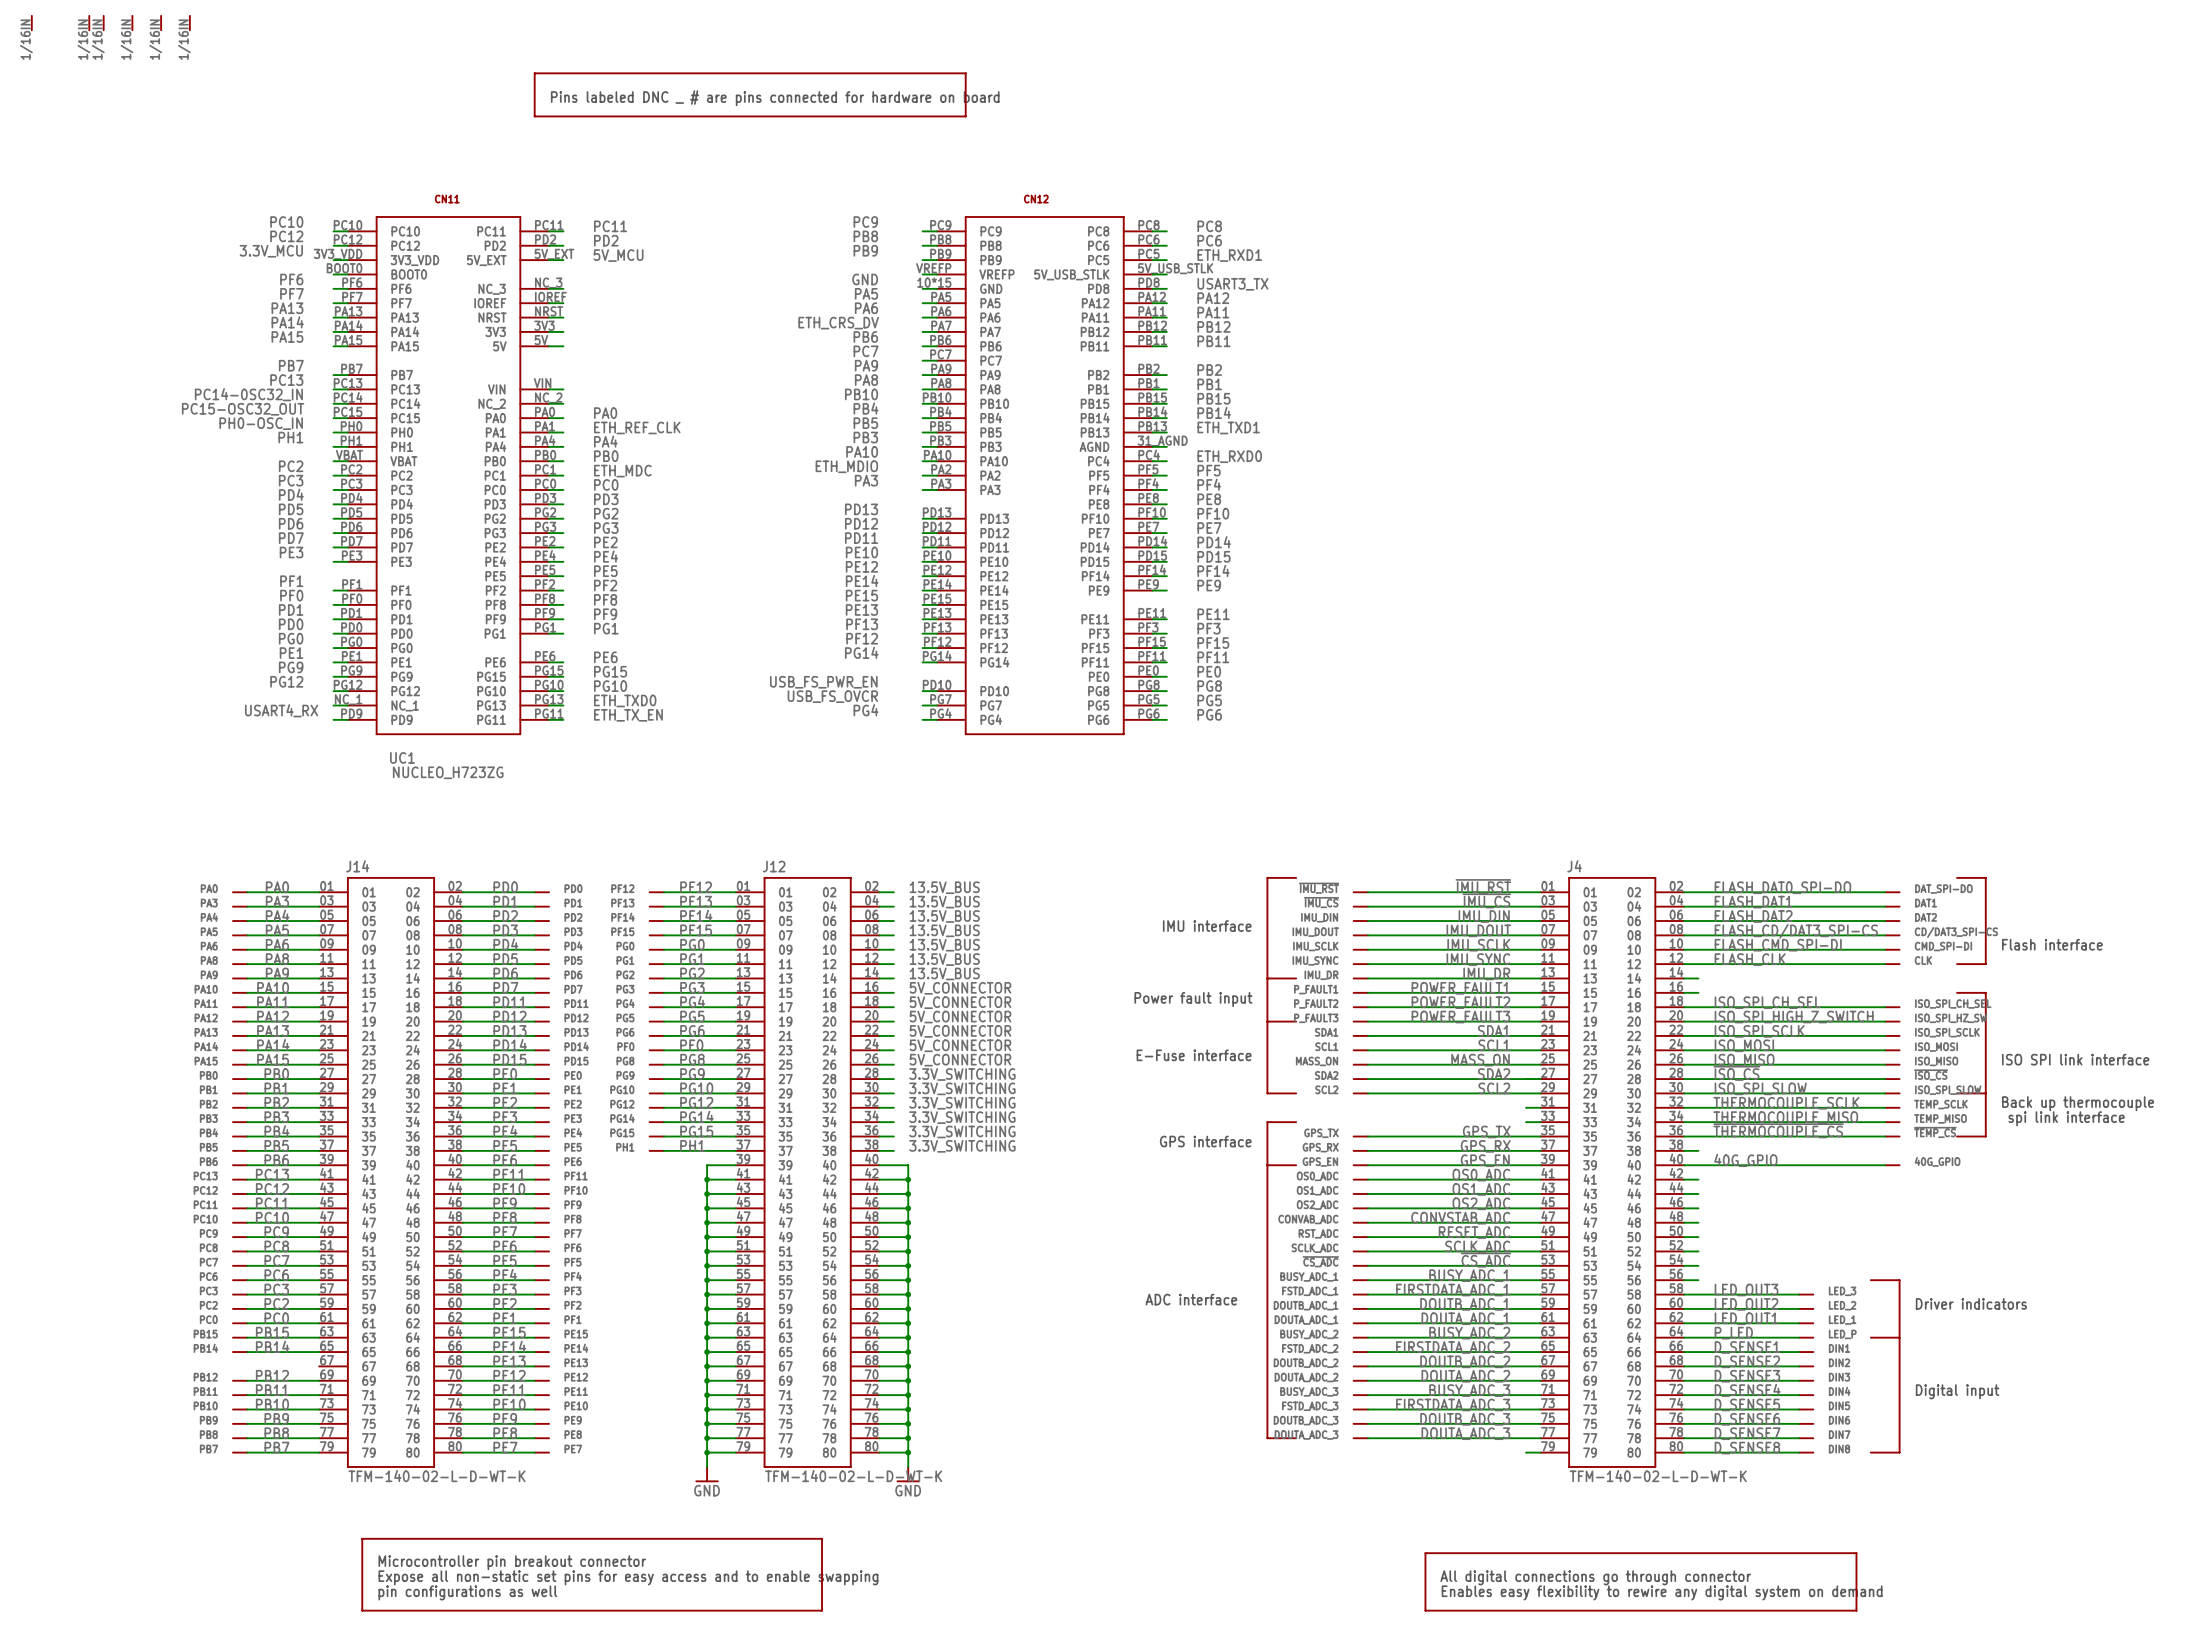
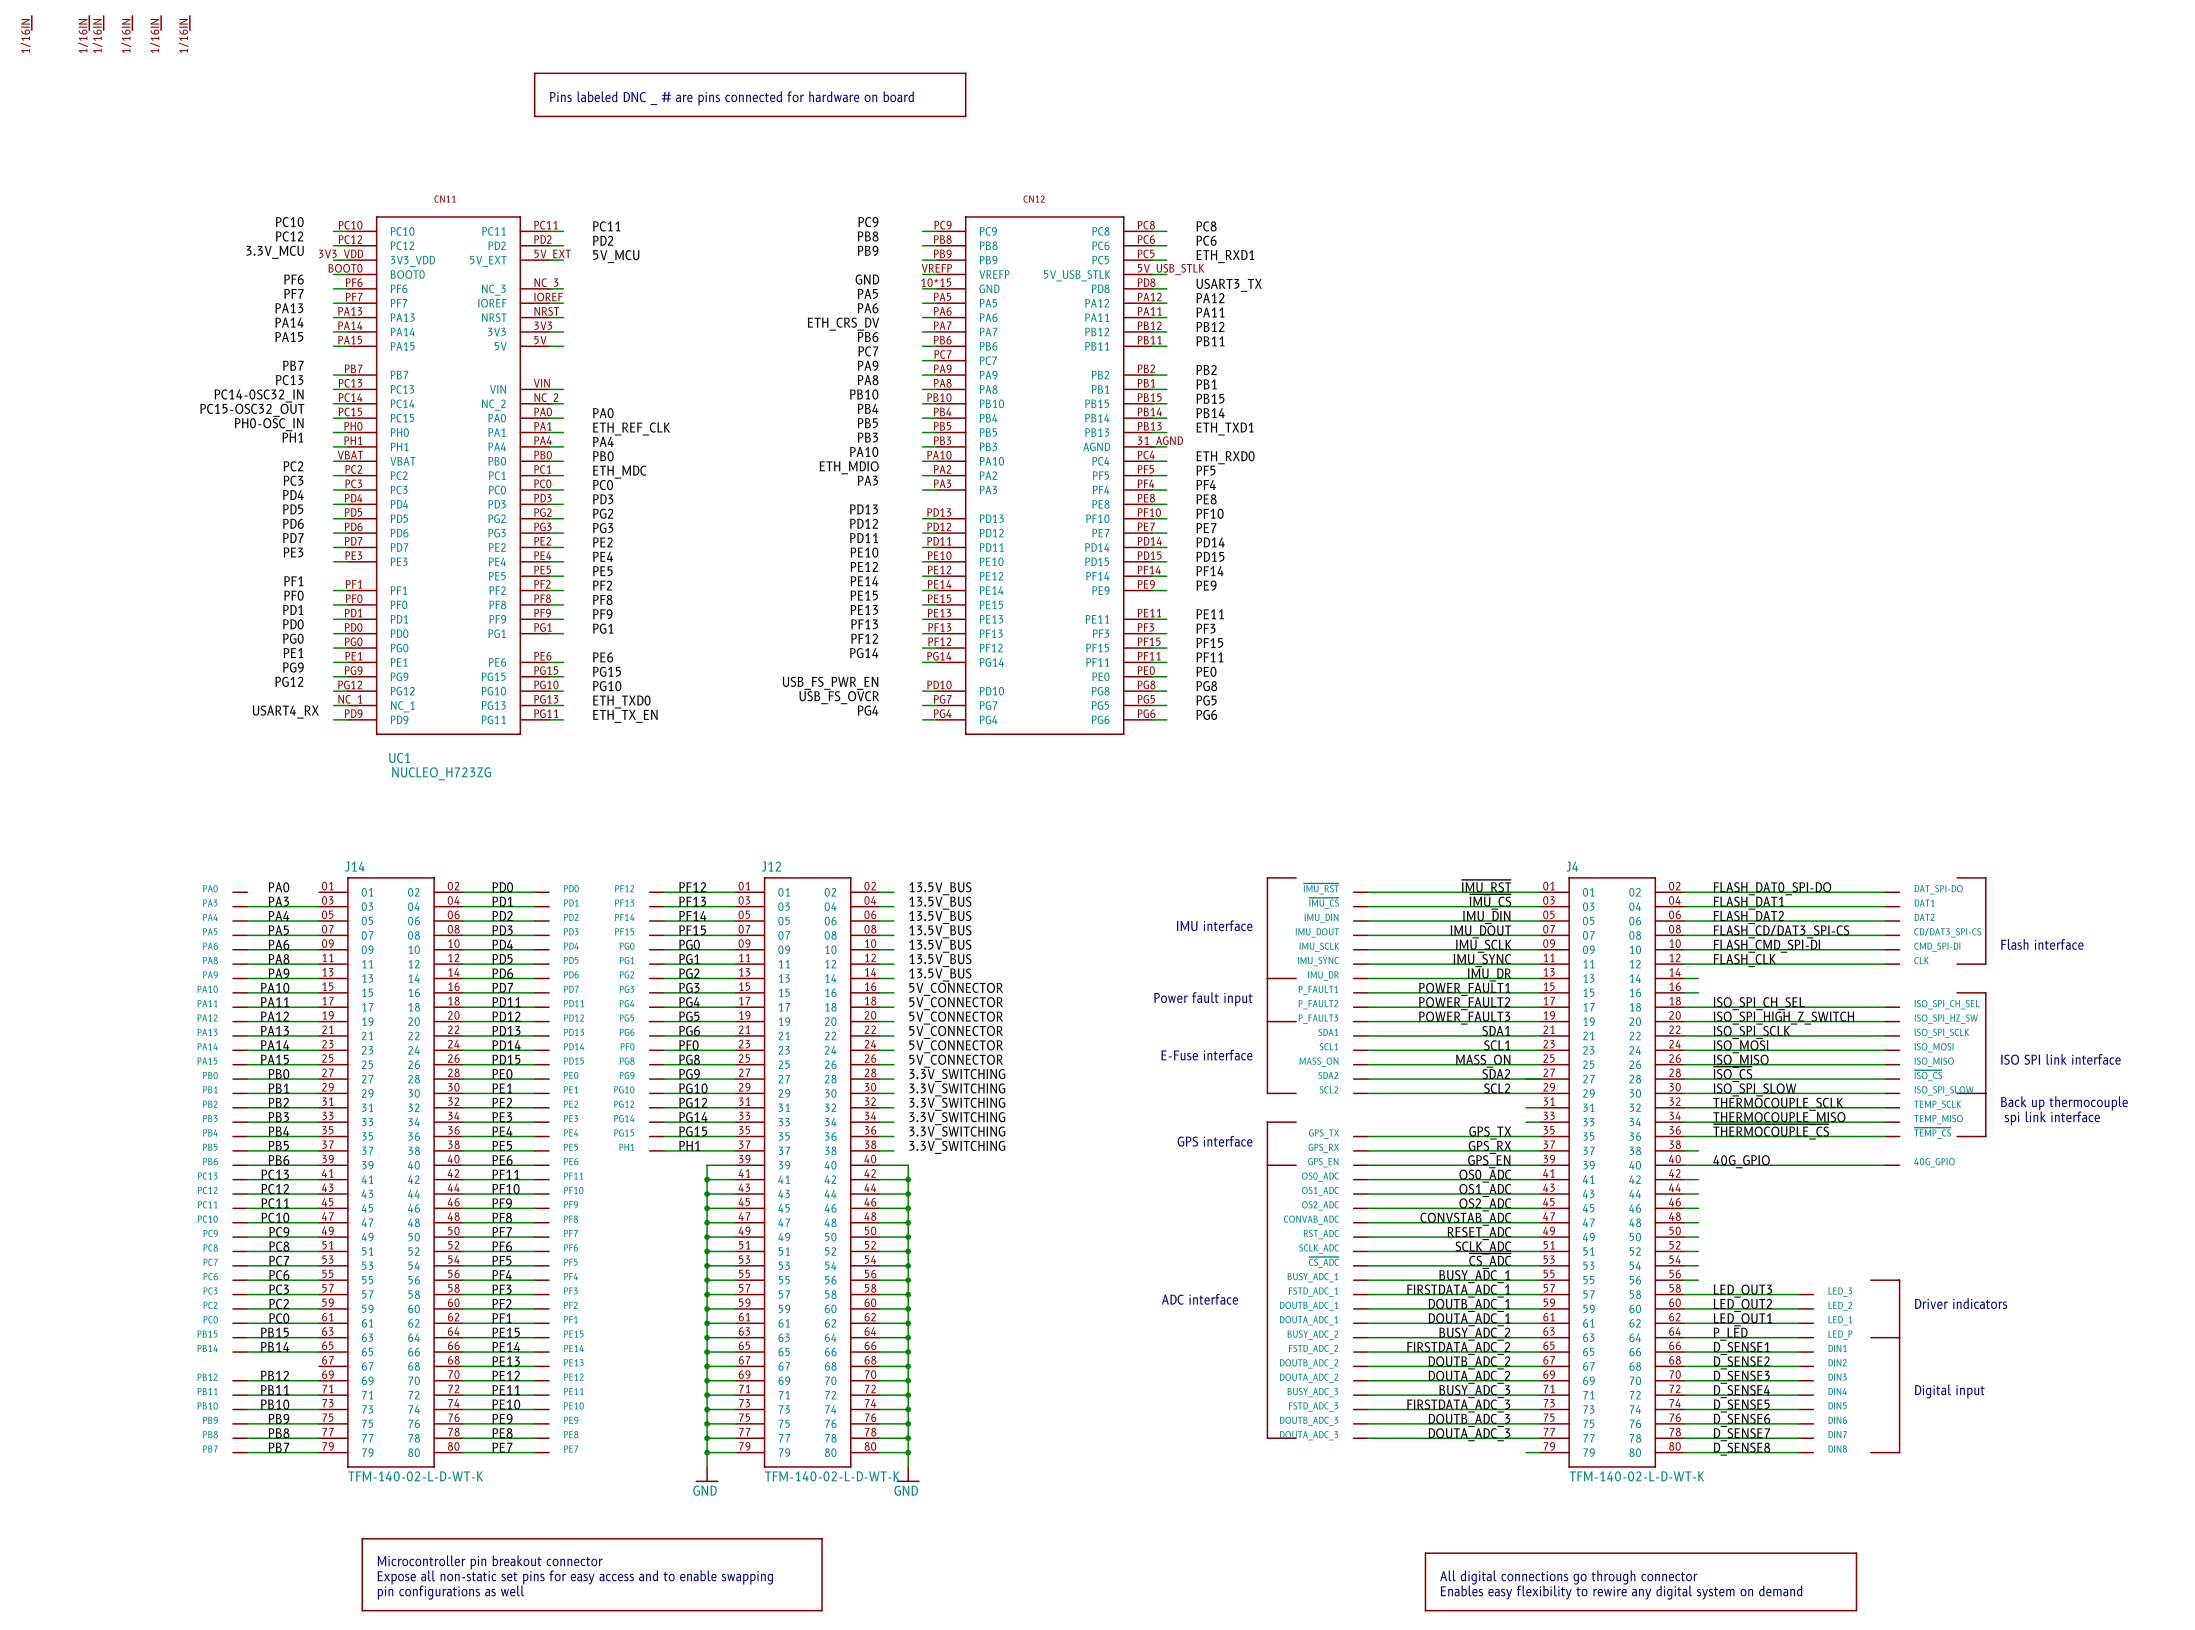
wire: (247, 892) (319, 892) -> none

